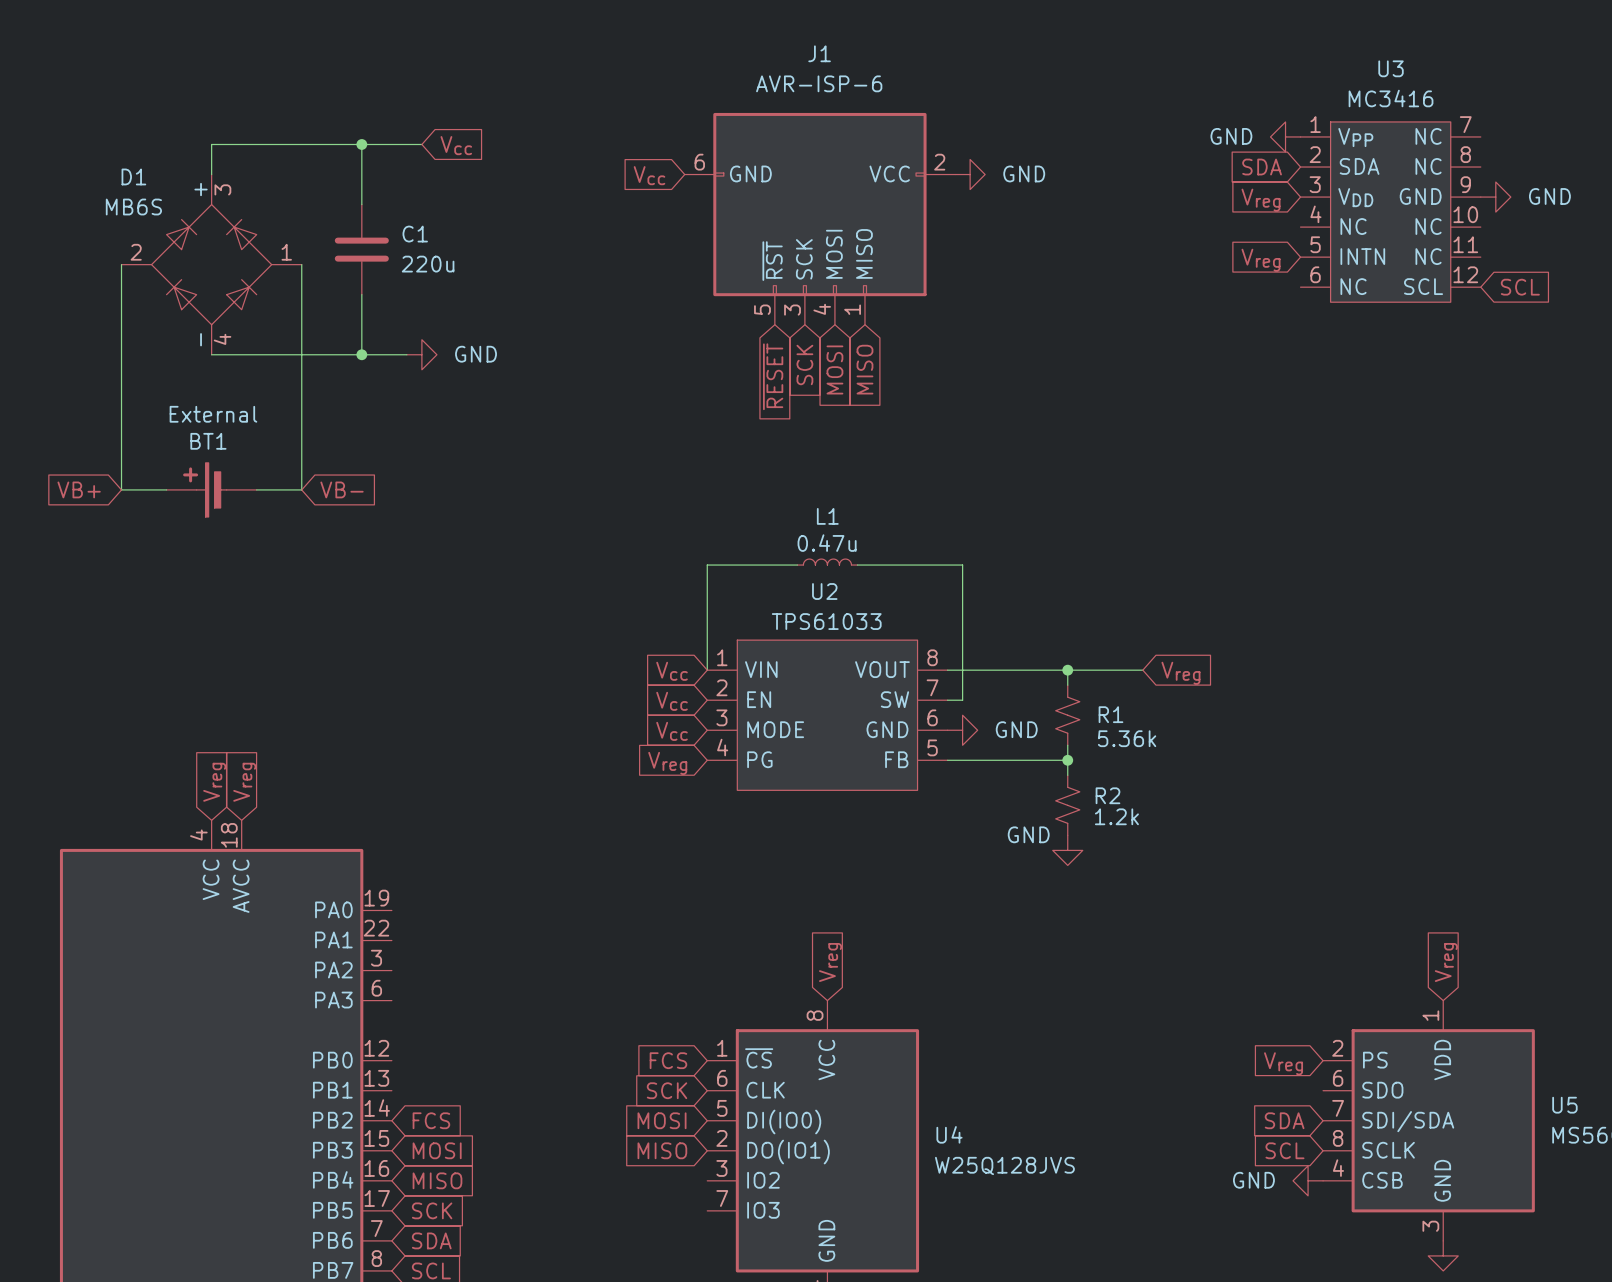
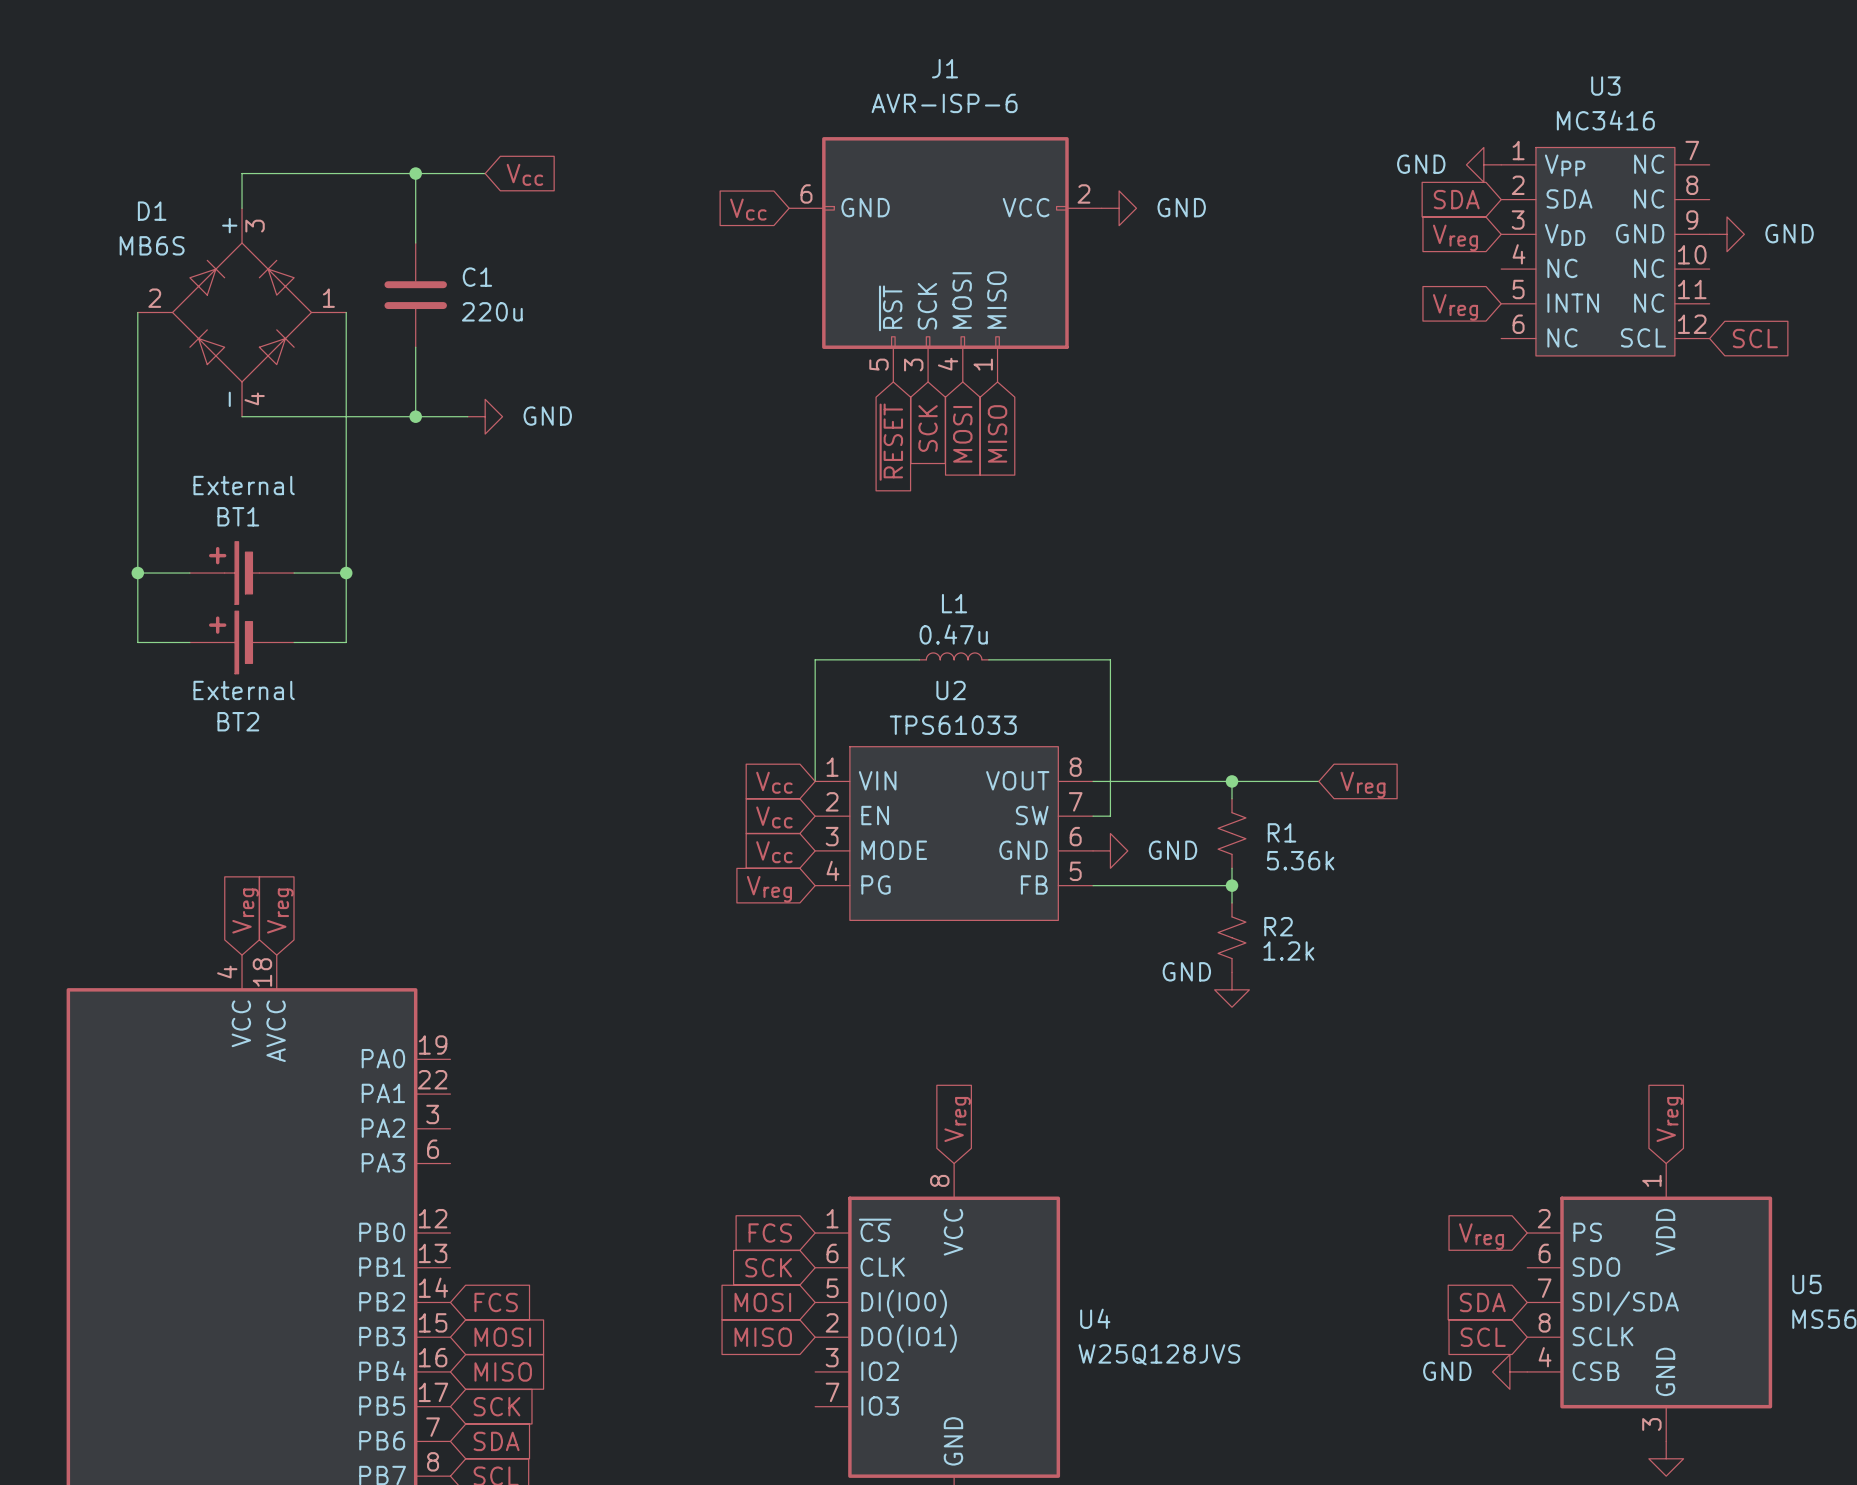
global label: VB+ (79, 489) -> none
wire: none -> (137, 573) (137, 642) (189, 642)
junction: none -> (137, 573)
wire: none -> (346, 573) (346, 642) (294, 642)
junction: none -> (346, 573)
global label: VB- (342, 489) -> none
BT2: none -> External (242, 642)

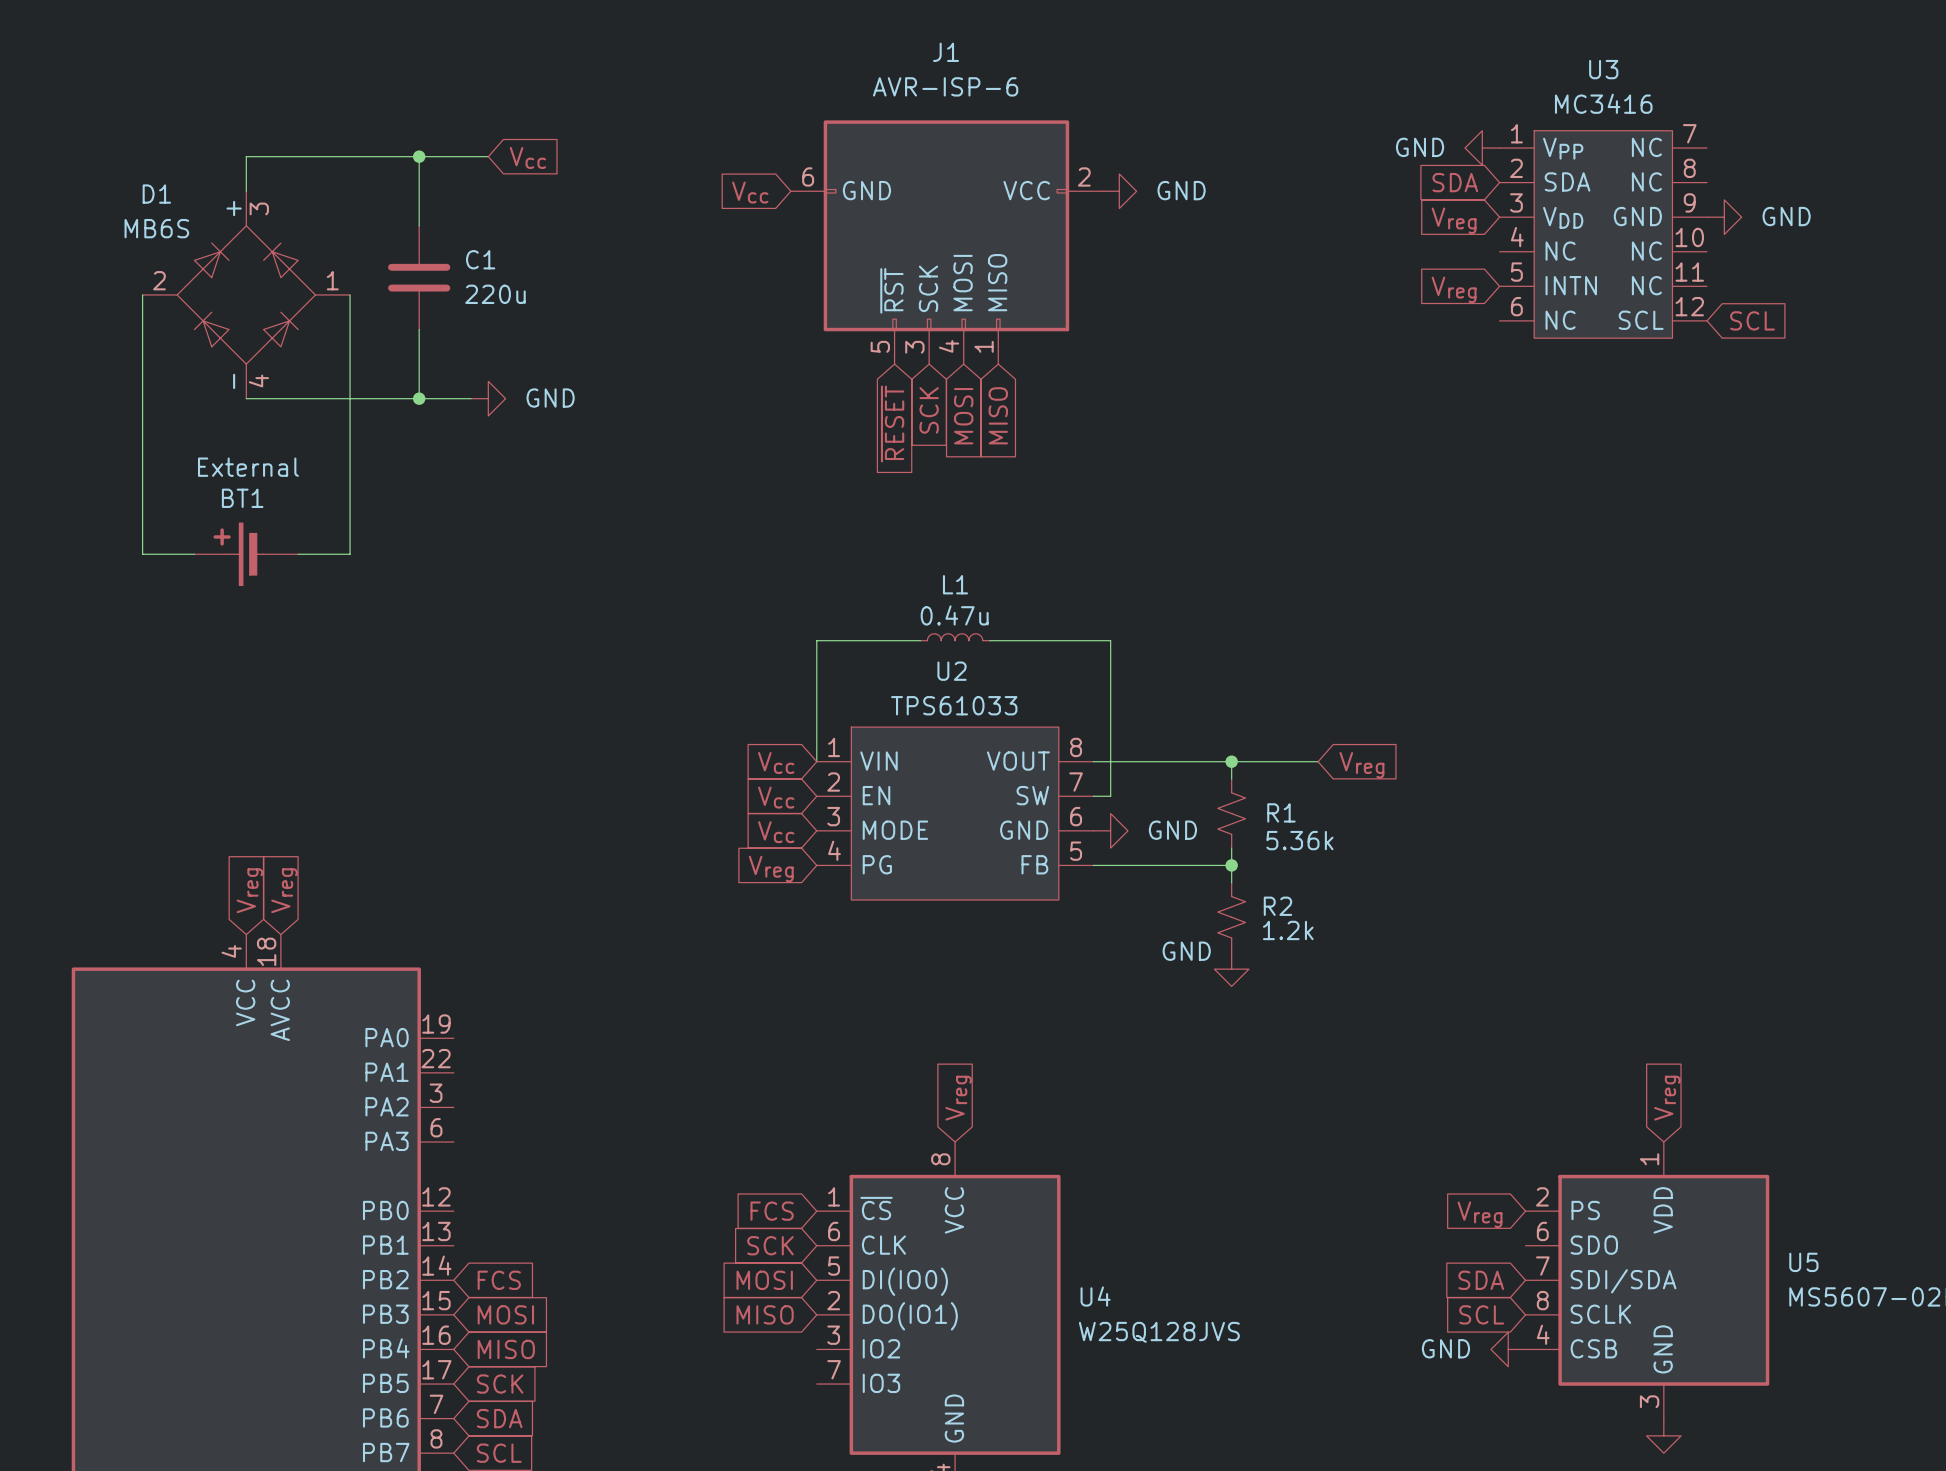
wire: (137, 573) (137, 642) (189, 642) -> none
junction: (137, 573) -> none
wire: (346, 573) (346, 642) (294, 642) -> none
junction: (346, 573) -> none
BT2: External (242, 642) -> none

